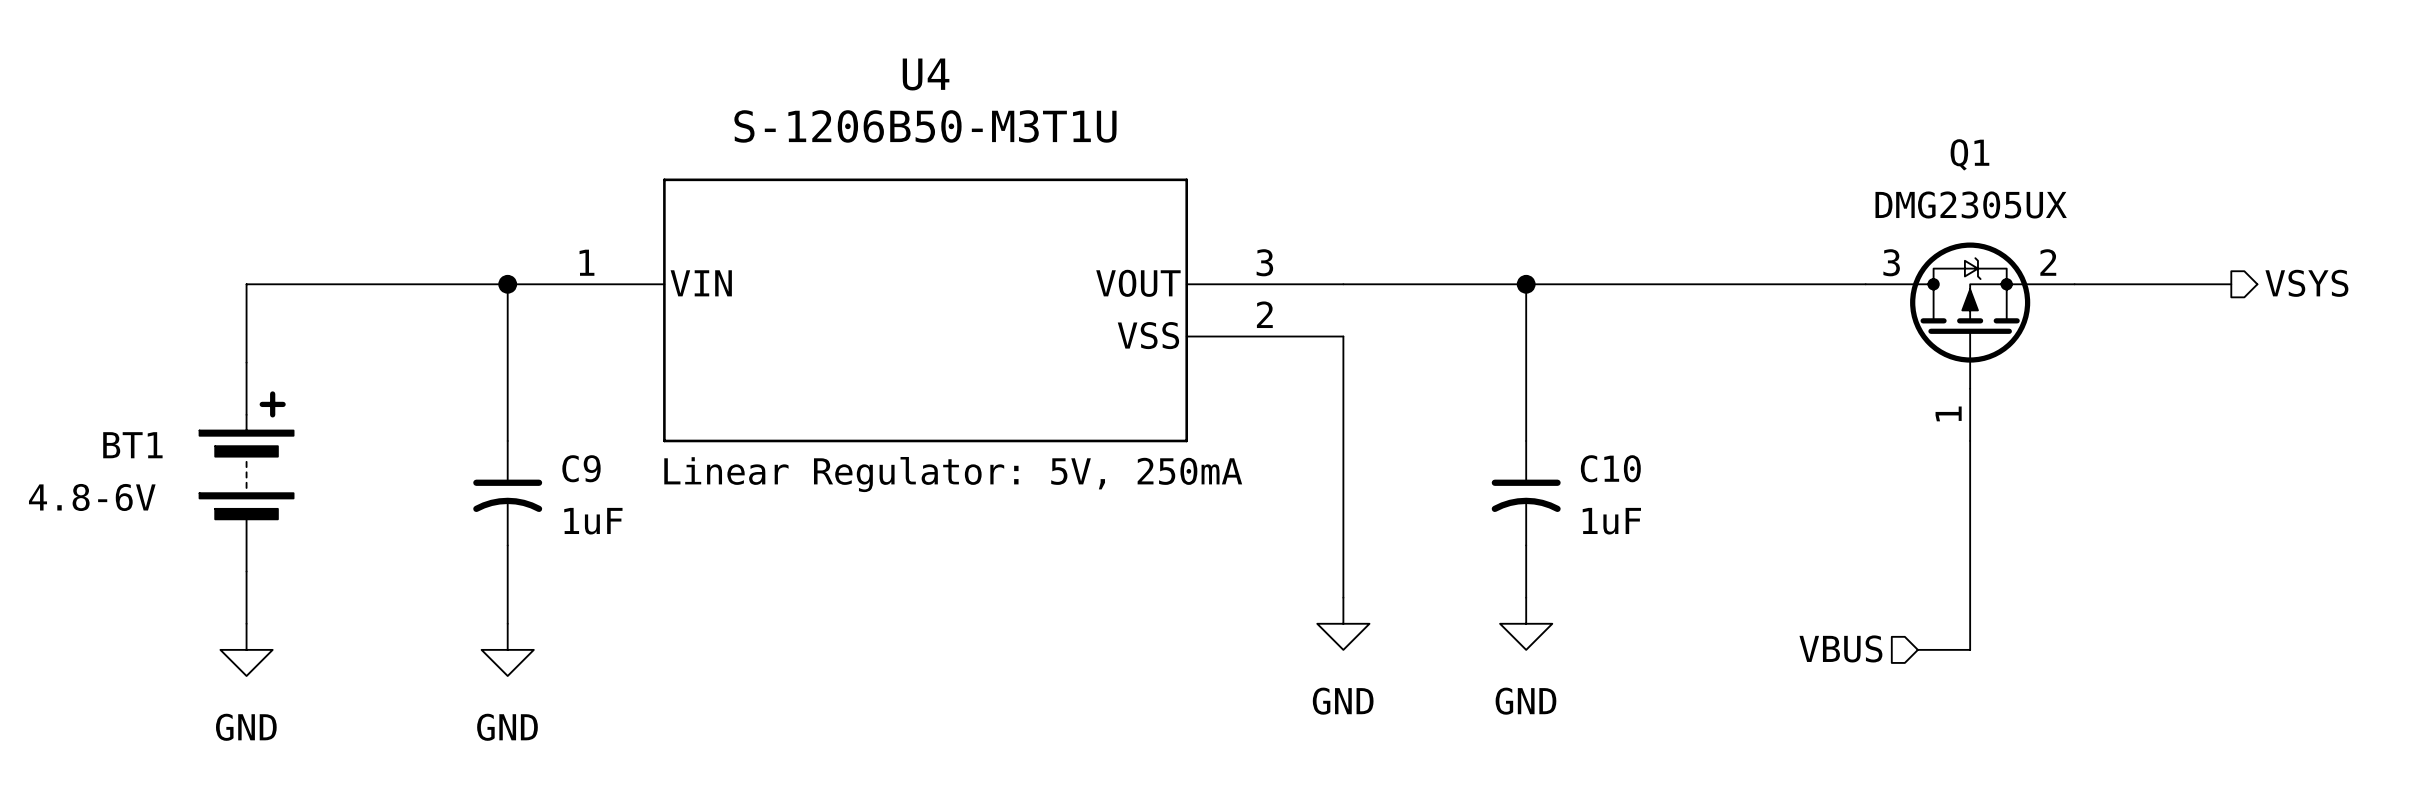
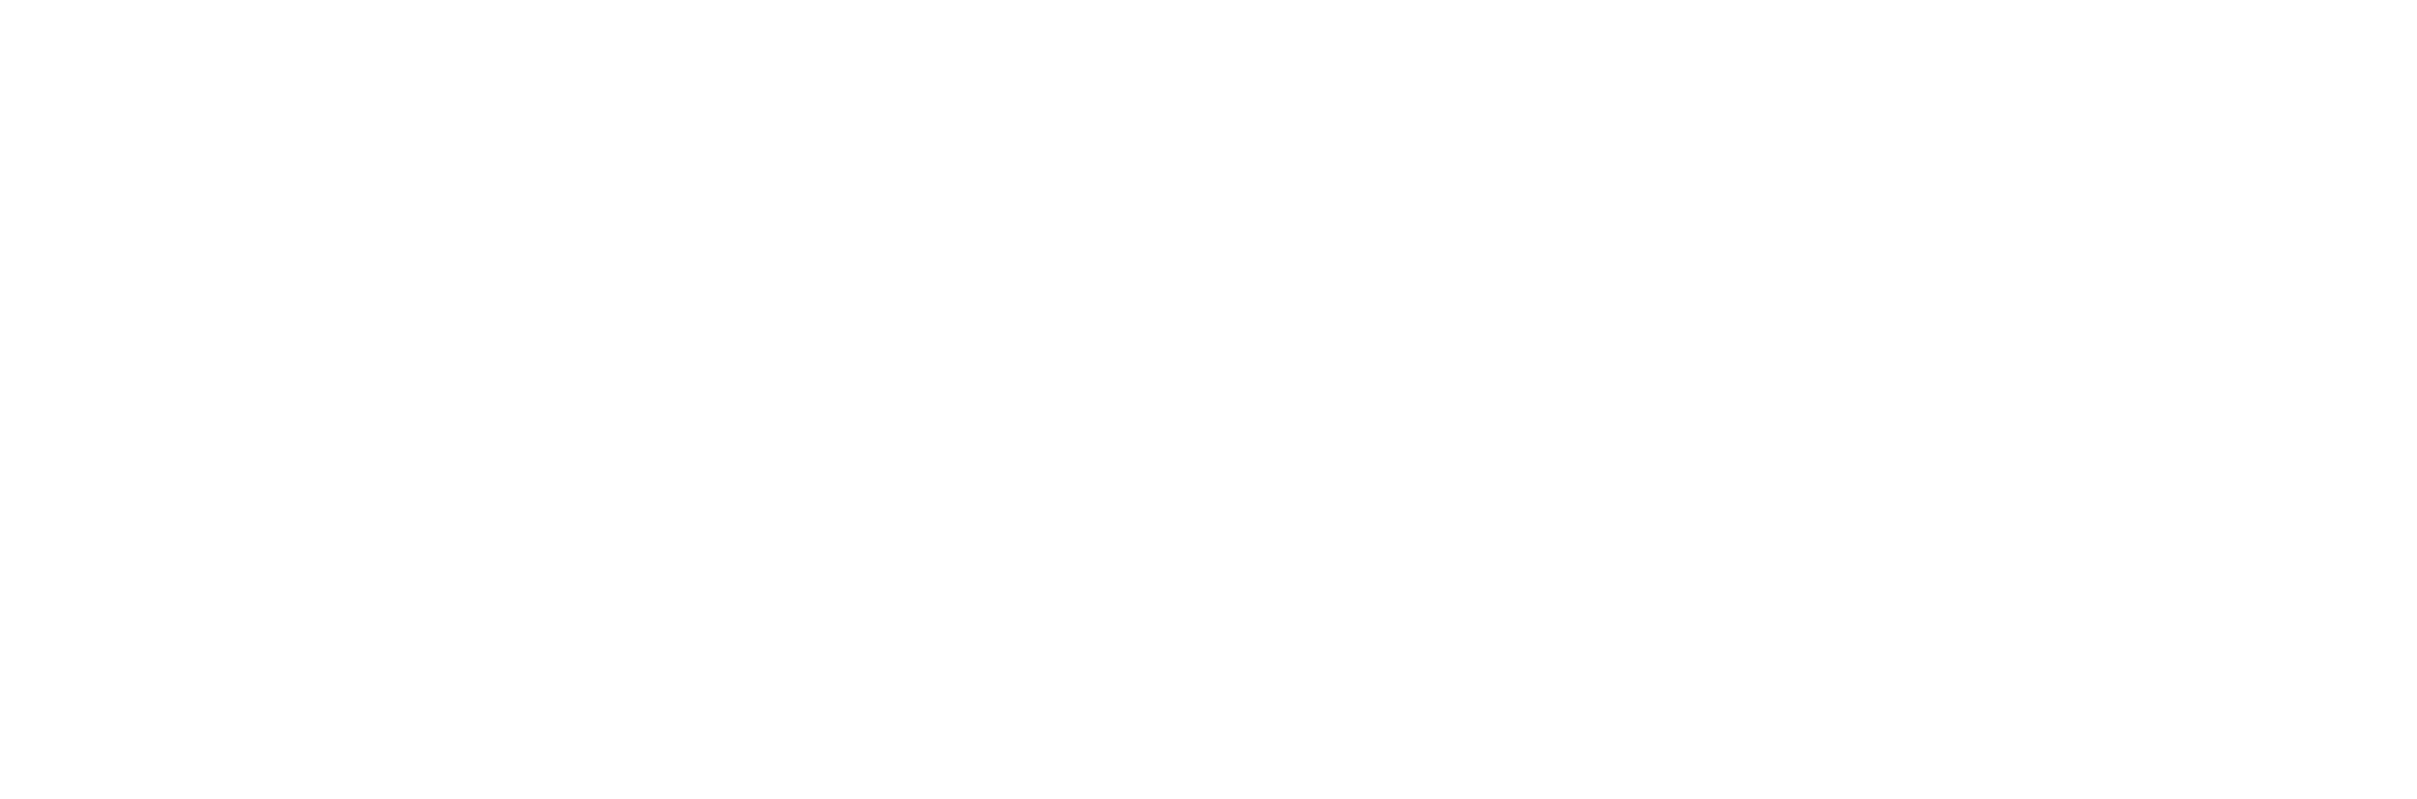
hierarchical label: VSYS (2306, 283) -> none
junction: (507, 284) -> none
wire: (1343, 284) (1865, 284) -> none
wire: (1526, 284) (1526, 440) -> none
junction: (1526, 284) -> none
wire: (2074, 284) (2231, 284) -> none
U4: S-1206B50-M3T1U (925, 310) -> none
wire: (1343, 336) (1343, 597) -> none
Q1: DMG2305UX (1970, 341) -> none
wire: (246, 362) (246, 284) (507, 284) (507, 440) -> none
wire: (1970, 440) (1970, 649) (1917, 649) -> none
BT1: 4.8-6V (246, 467) -> none
C9: 1uF (507, 493) -> none
C10: 1uF (1526, 493) -> none
wire: (507, 545) (507, 623) -> none
wire: (1526, 545) (1526, 597) -> none
wire: (246, 571) (246, 623) -> none
power symbol: GND (1343, 623) -> none
power symbol: GND (1526, 623) -> none
hierarchical label: VBUS (1840, 648) -> none
power symbol: GND (246, 649) -> none
power symbol: GND (507, 649) -> none

